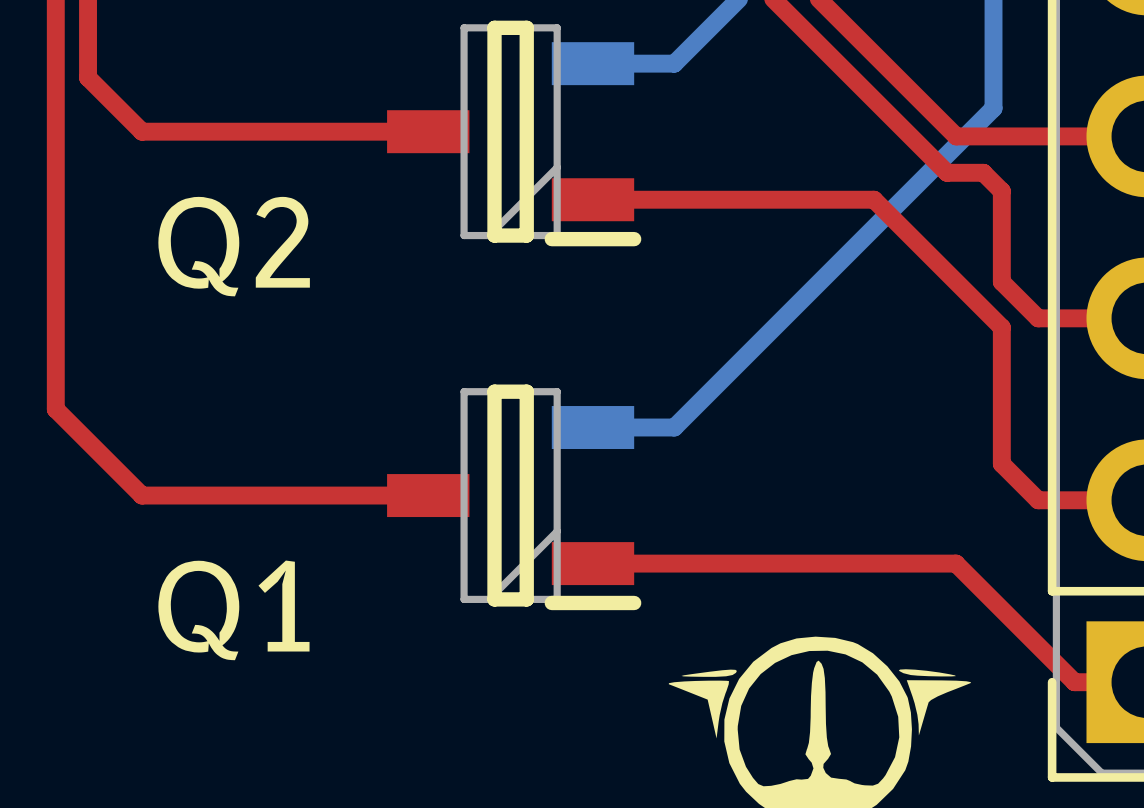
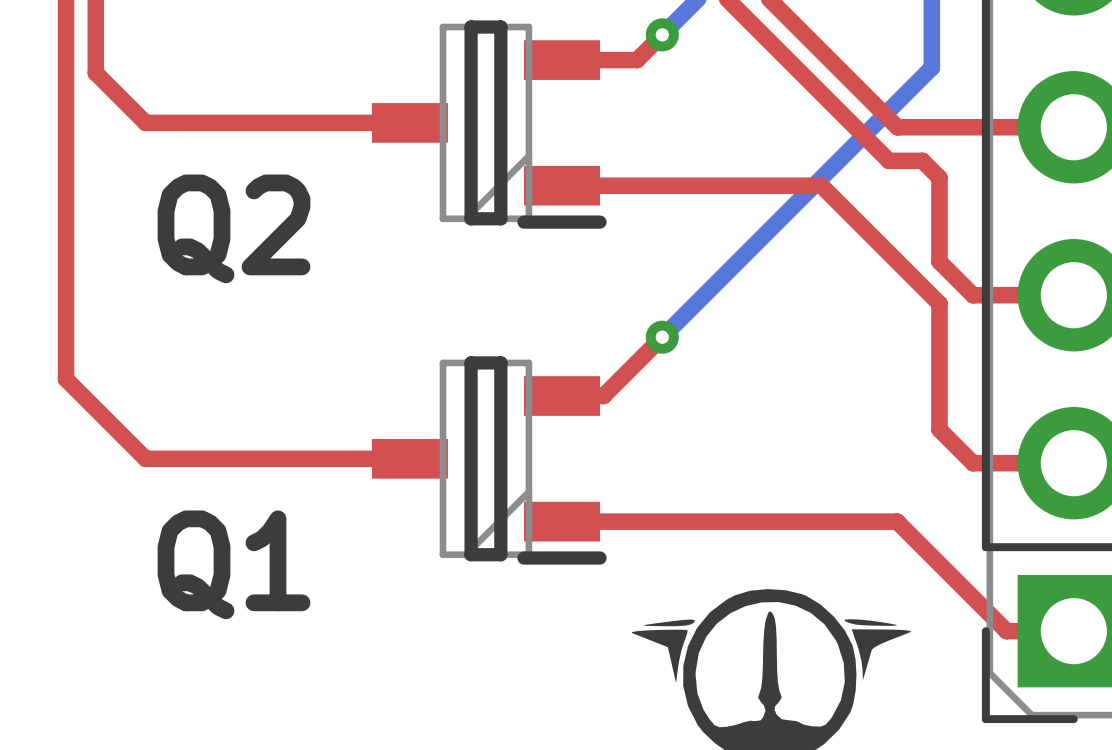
Q2 footprint: [387, 20, 642, 247] -> [371, 20, 607, 229]
top track: none -> (662, 34) (637, 60) (562, 60)
bottom track: (701, 36) (674, 63) (592, 63) -> none
via: none -> (662, 34)
bottom track: (993, 71) (993, 108) (674, 427) (592, 427) -> (931, 67) (662, 337)
top track: none -> (662, 337) (603, 396) (562, 396)
via: none -> (662, 337)
Q1 footprint: [387, 384, 642, 611] -> [371, 356, 607, 565]

